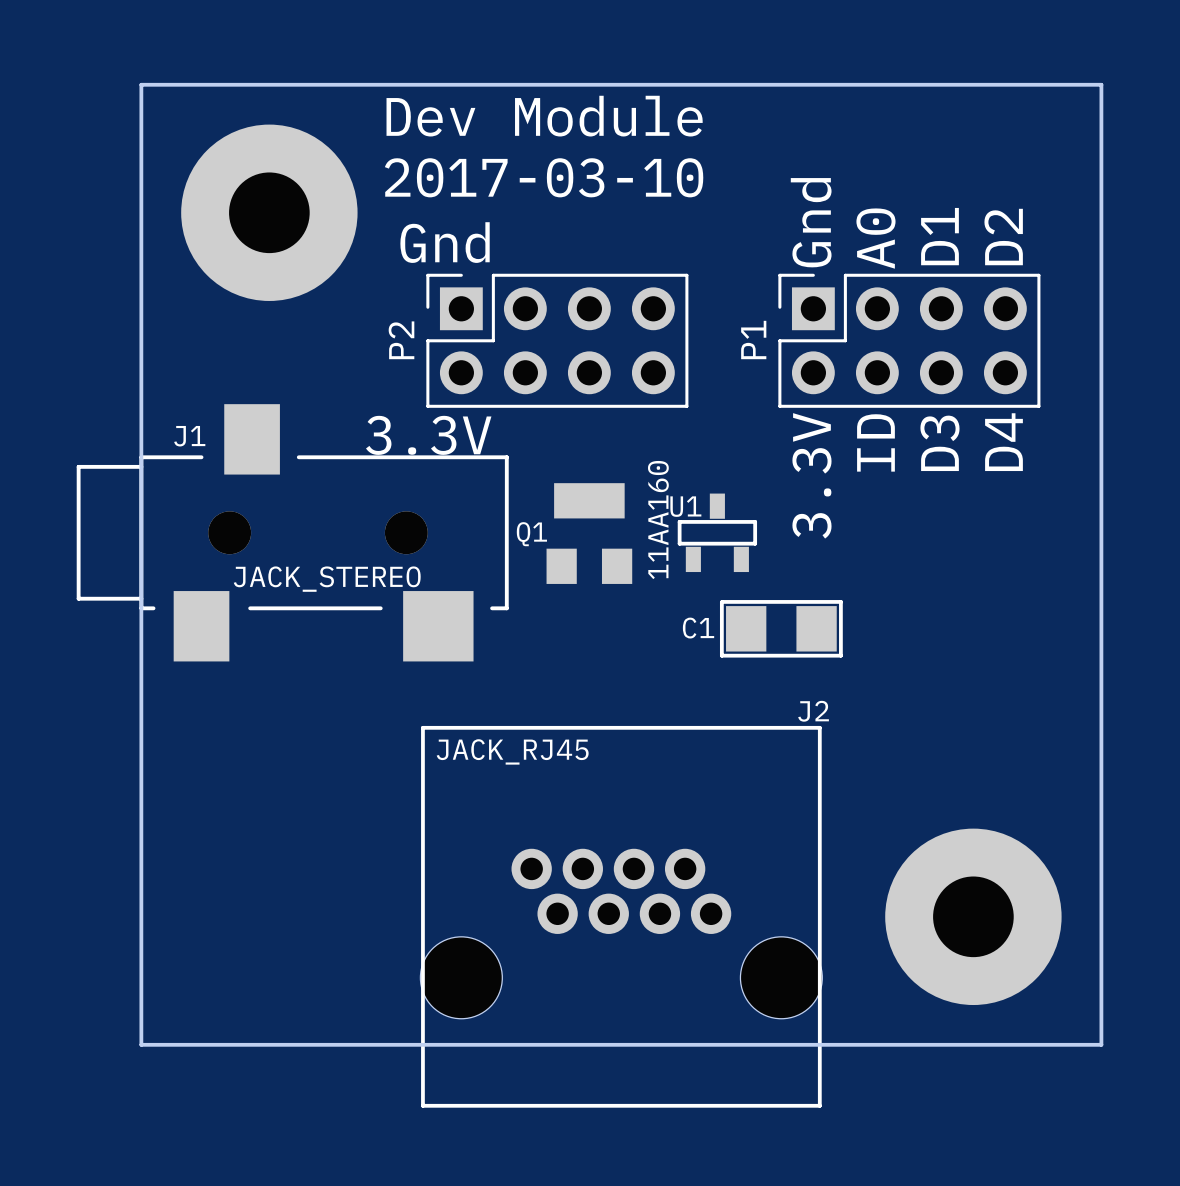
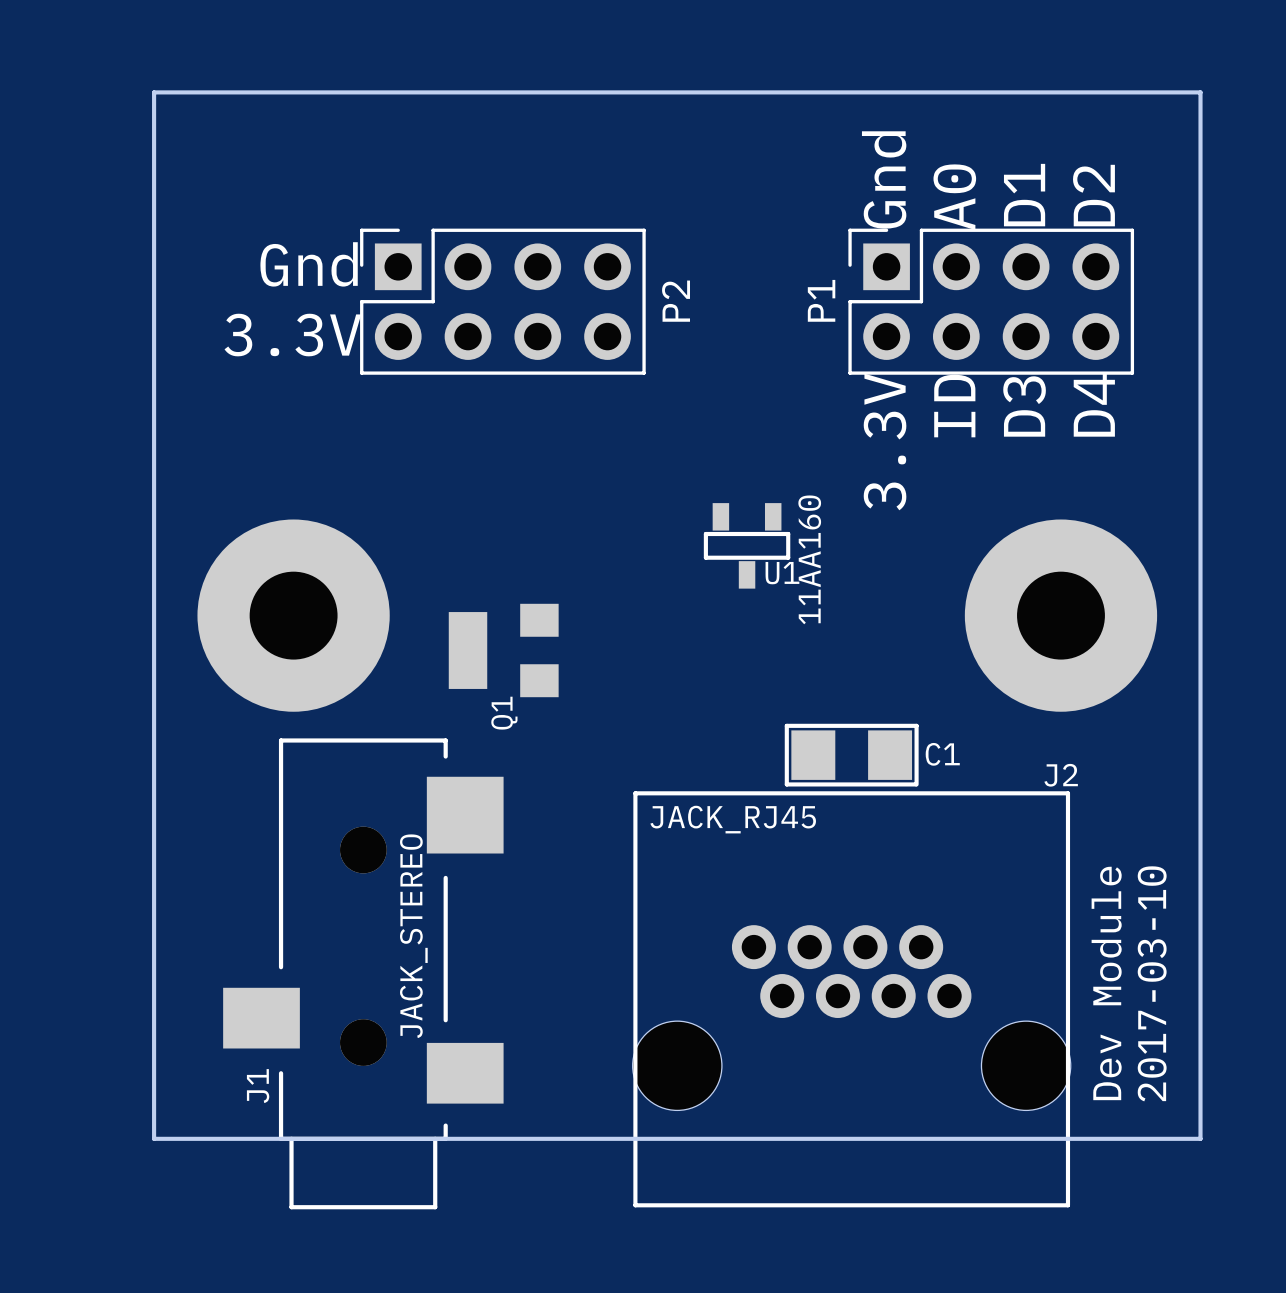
text: Dev Module (544, 116) -> none
text: 2017-03-10 (544, 177) -> none
part position: (269, 212) -> (293, 615)
text position: Gnd (811, 222) -> Gnd (884, 179)
text position: D1 (939, 236) -> D1 (1024, 195)
text position: D2 (1003, 237) -> D2 (1093, 195)
text position: A0 (875, 238) -> A0 (954, 197)
text position: Gnd (445, 242) -> Gnd (309, 264)
text: none -> 3.3V (292, 335)
P2 name position: P2 (401, 340) -> P2 (676, 301)
P2 position: (557, 340) -> (502, 301)
P1 position: (909, 340) -> (991, 301)
text: 3.3V (428, 435) -> none
text position: ID (875, 442) -> ID (954, 406)
text position: D4 (1003, 442) -> D4 (1094, 405)
text position: D3 (939, 443) -> D3 (1024, 406)
text position: 3.3V (811, 475) -> 3.3V (885, 441)
J1 rotation: 0° (292, 532) -> 90° counterclockwise (363, 973)
J1 position: (292, 532) -> (363, 973)
U1 rotation: 0° (717, 532) -> 180° (747, 545)
Q1 rotation: 0° (589, 533) -> 90° counterclockwise (503, 650)
Q1 position: (589, 533) -> (503, 650)
C1 rotation: 0° (781, 628) -> 180° (851, 755)
text: none -> Dev Module (1106, 983)
text: none -> 2017-03-10 (1152, 983)
J2 position: (621, 916) -> (851, 999)
part position: (973, 916) -> (1060, 615)

